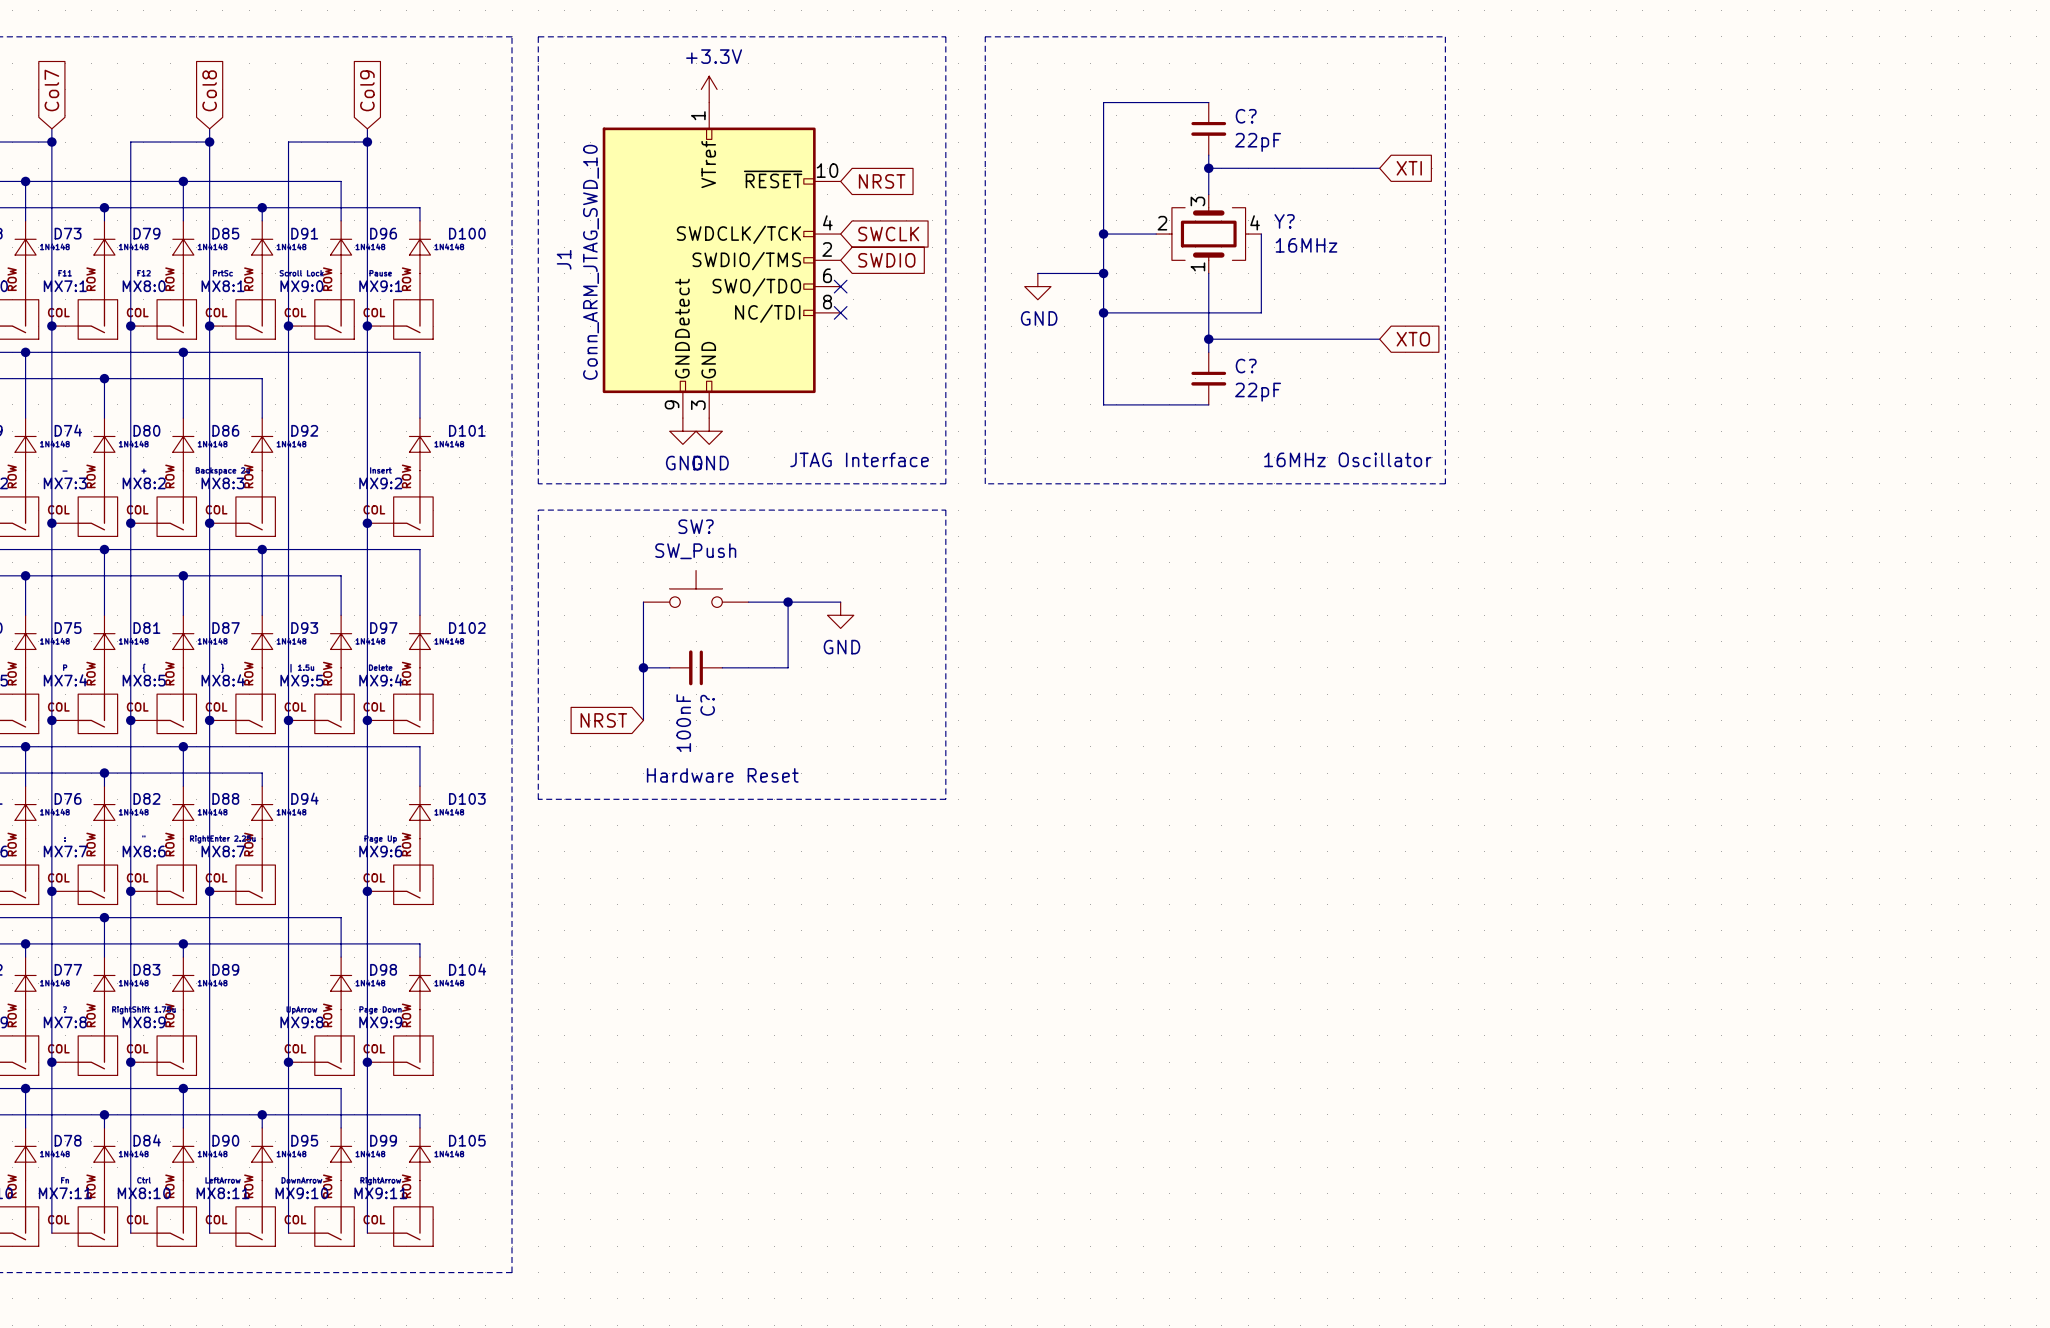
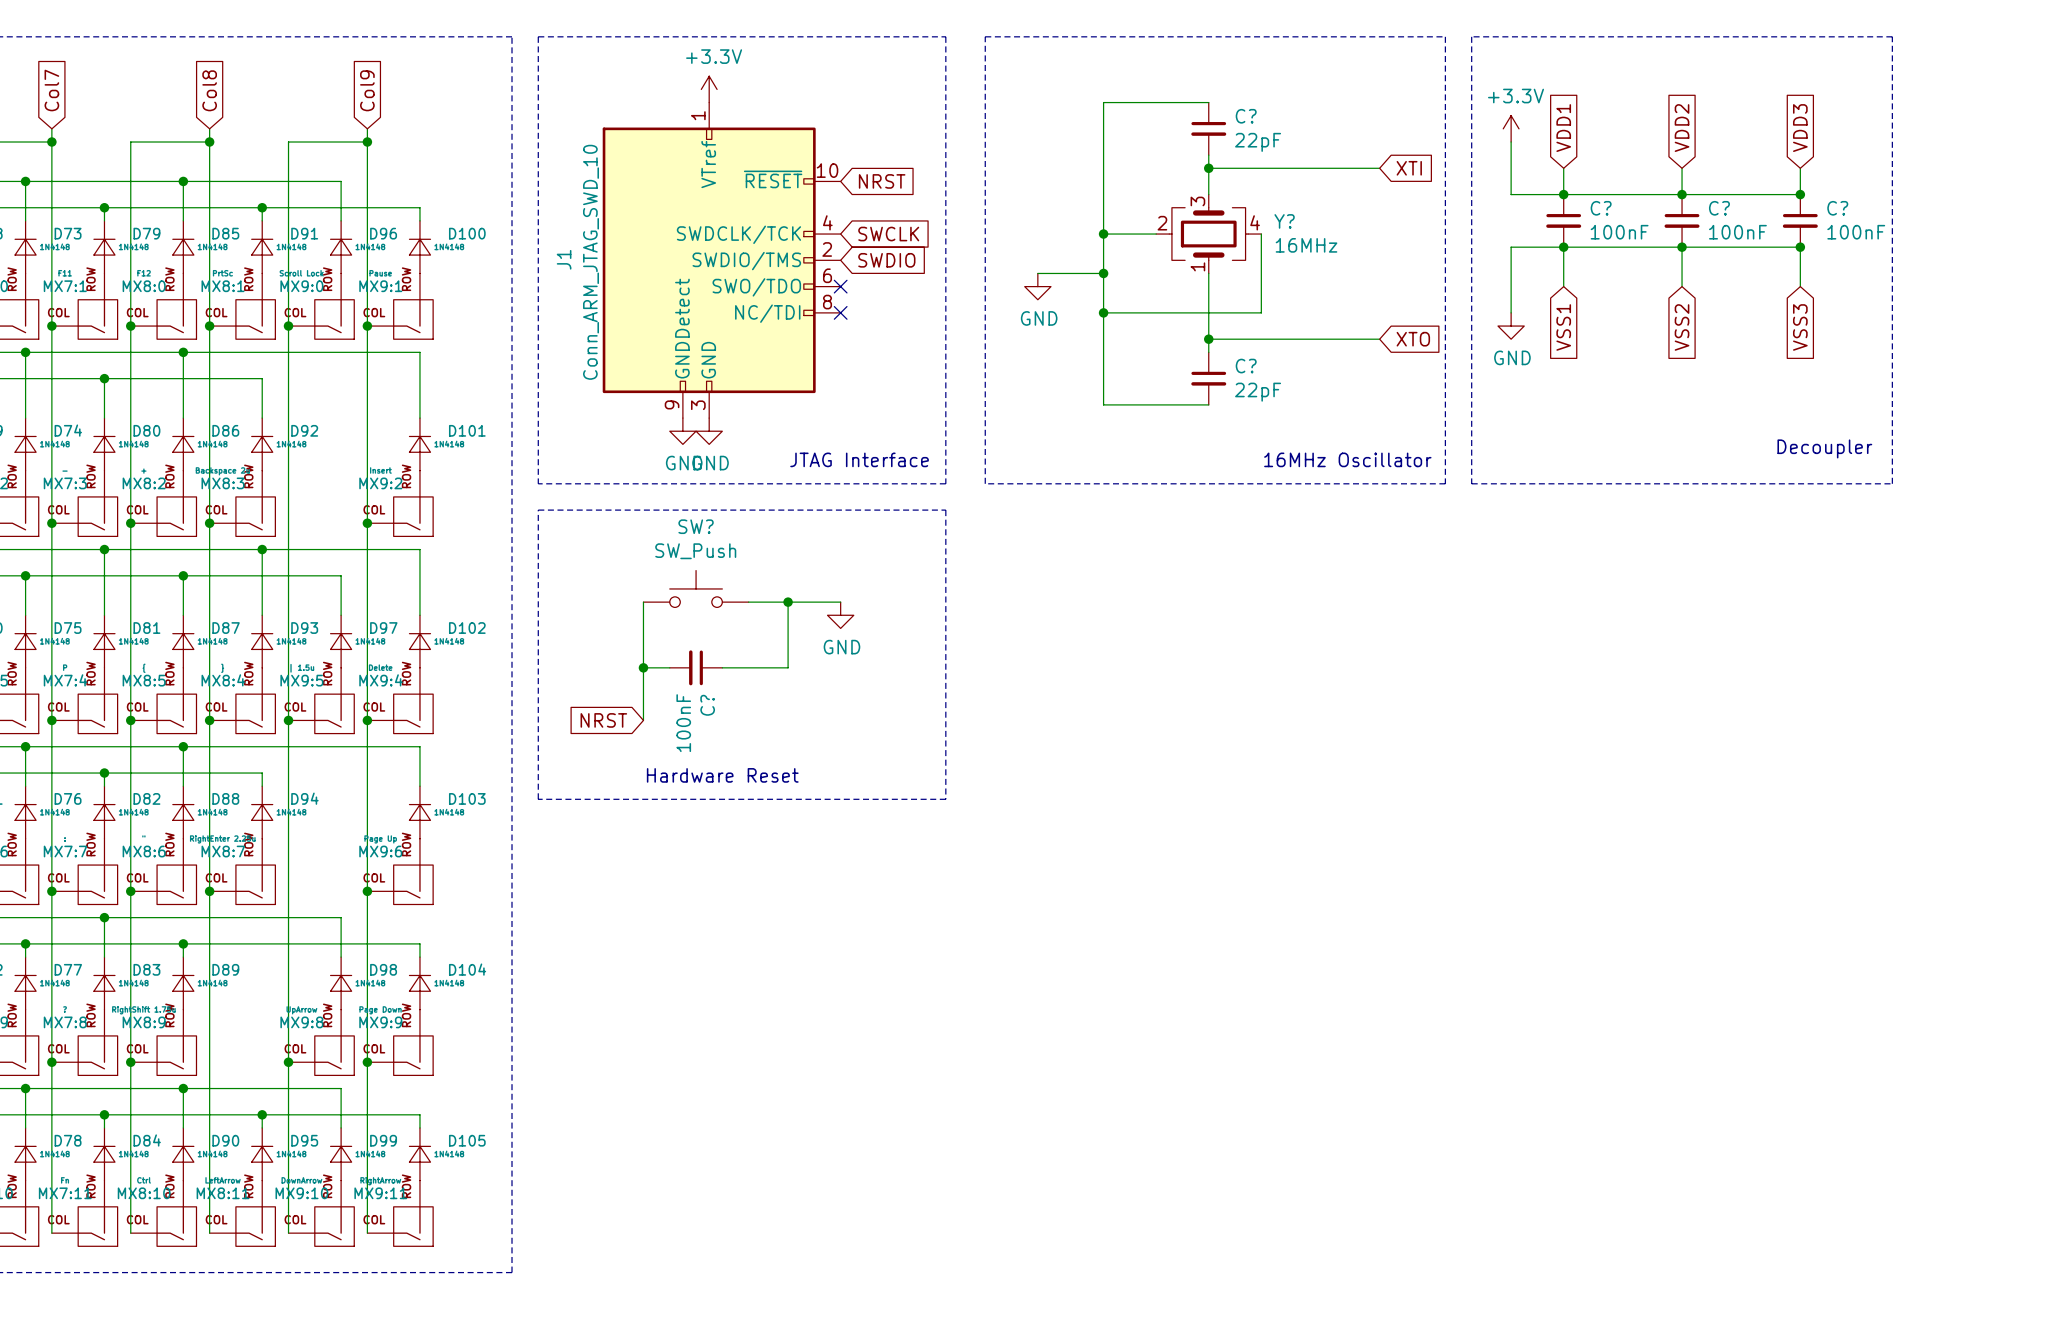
line: none -> (1471, 36) (1471, 483) (1892, 483) (1892, 36) (1471, 36)
power symbol: none -> +3.3V (1511, 128)
global label: none -> VDD1 (1563, 128)
global label: none -> VDD2 (1682, 128)
global label: none -> VDD3 (1800, 128)
wire: none -> (1511, 142) (1511, 194) (1800, 194) (1800, 168)
wire: none -> (1563, 168) (1563, 194)
wire: none -> (1682, 168) (1682, 194)
junction: none -> (1563, 194)
junction: none -> (1682, 194)
junction: none -> (1800, 194)
C?: none -> 100nF (1563, 220)
C?: none -> 100nF (1682, 220)
C?: none -> 100nF (1800, 220)
wire: none -> (1563, 247) (1563, 286)
junction: none -> (1563, 247)
wire: none -> (1682, 247) (1682, 286)
junction: none -> (1682, 247)
junction: none -> (1800, 247)
wire: none -> (1800, 286) (1800, 247) (1511, 247) (1511, 312)
power symbol: none -> GND (1511, 326)
global label: none -> VSS1 (1563, 327)
global label: none -> VSS2 (1682, 327)
global label: none -> VSS3 (1800, 327)
text: none -> Decoupler (1824, 448)

